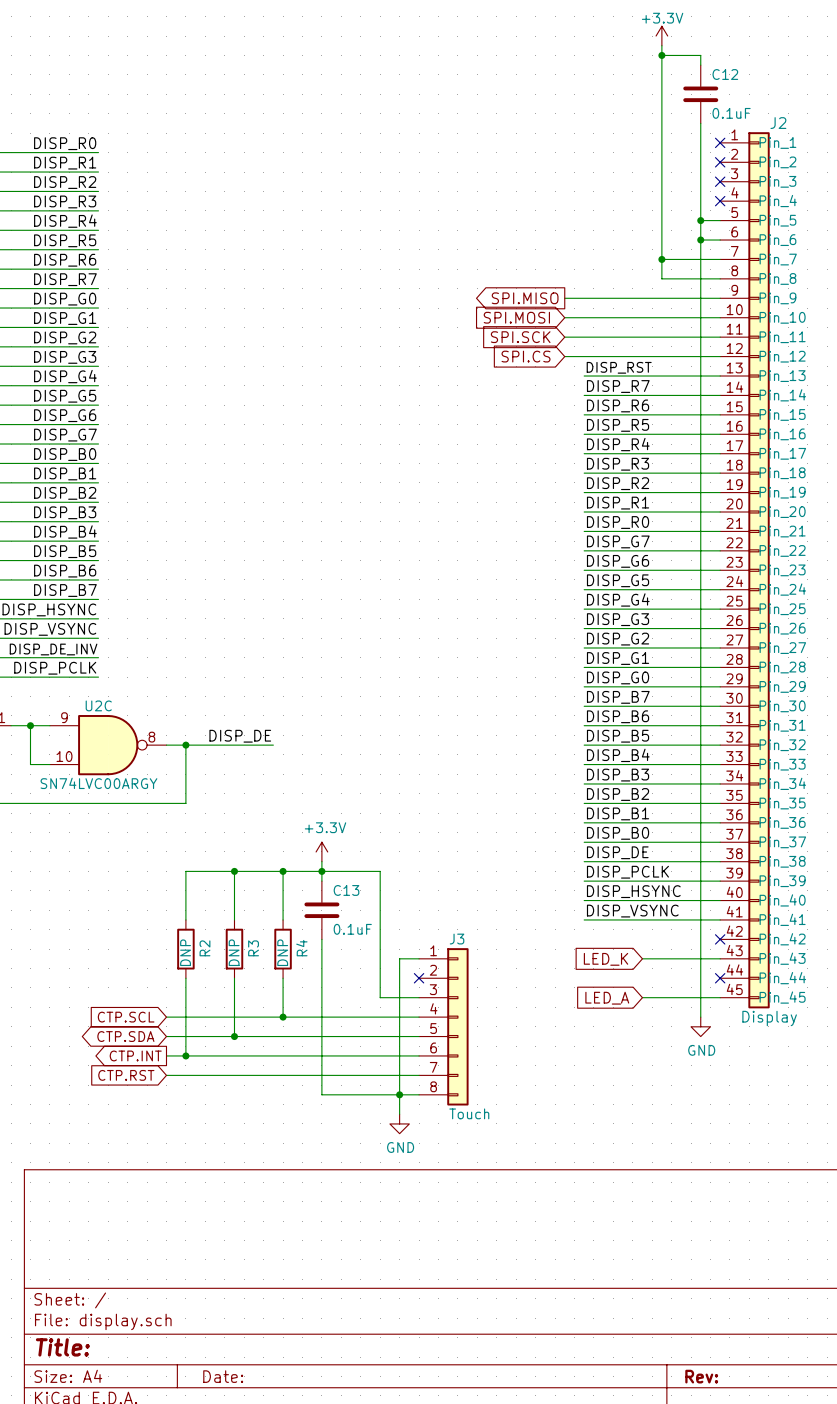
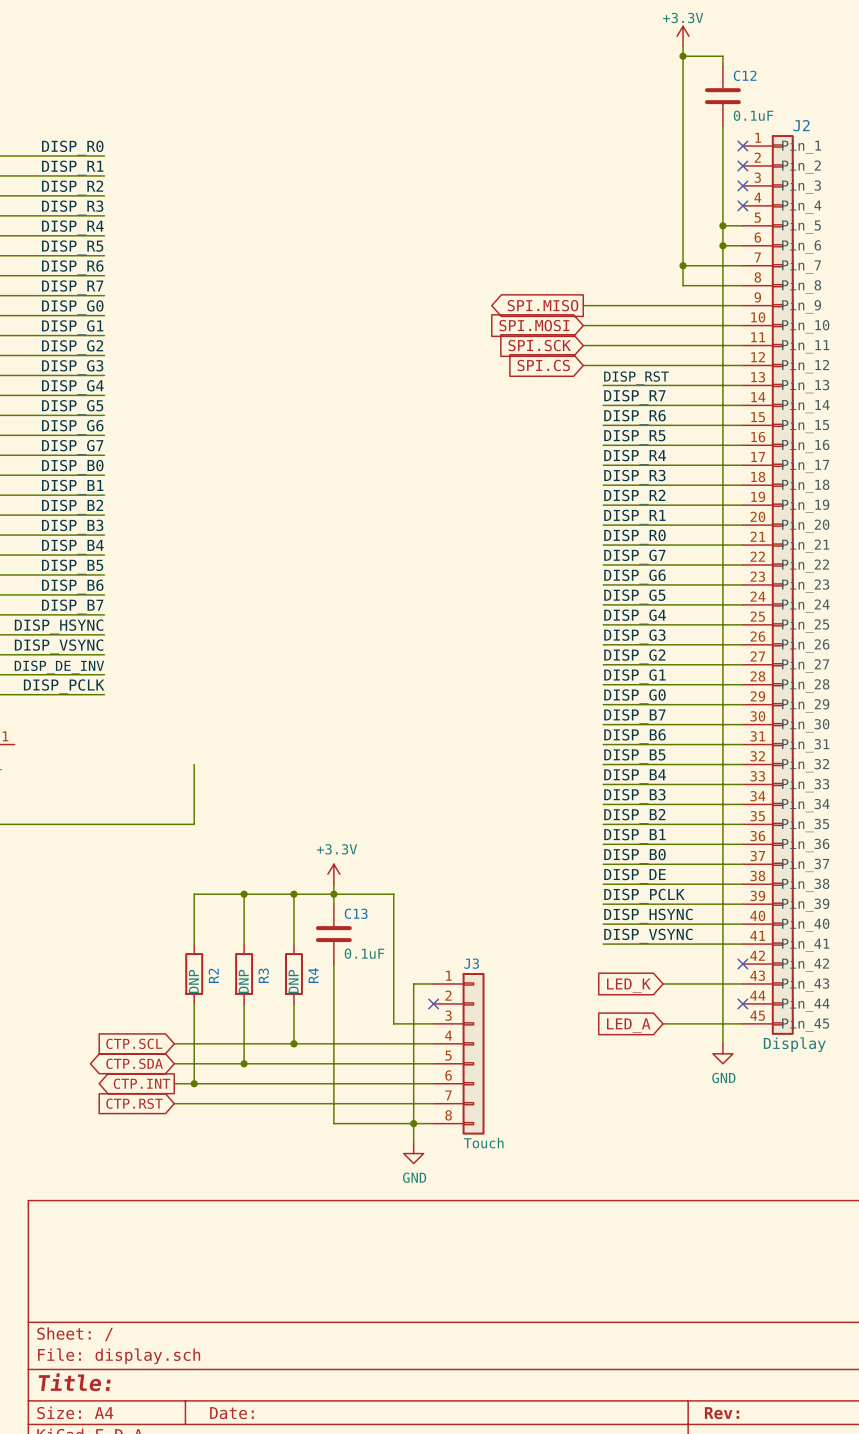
wire: (11, 725) (49, 725) -> none
wire: (30, 725) (30, 764) (49, 764) -> none
junction: (30, 725) -> none
label: DISP_DE (240, 736) -> none
U2C: SN74LVC00ARGY (108, 745) -> none
wire: (166, 745) (273, 745) -> none
junction: (185, 745) -> none

